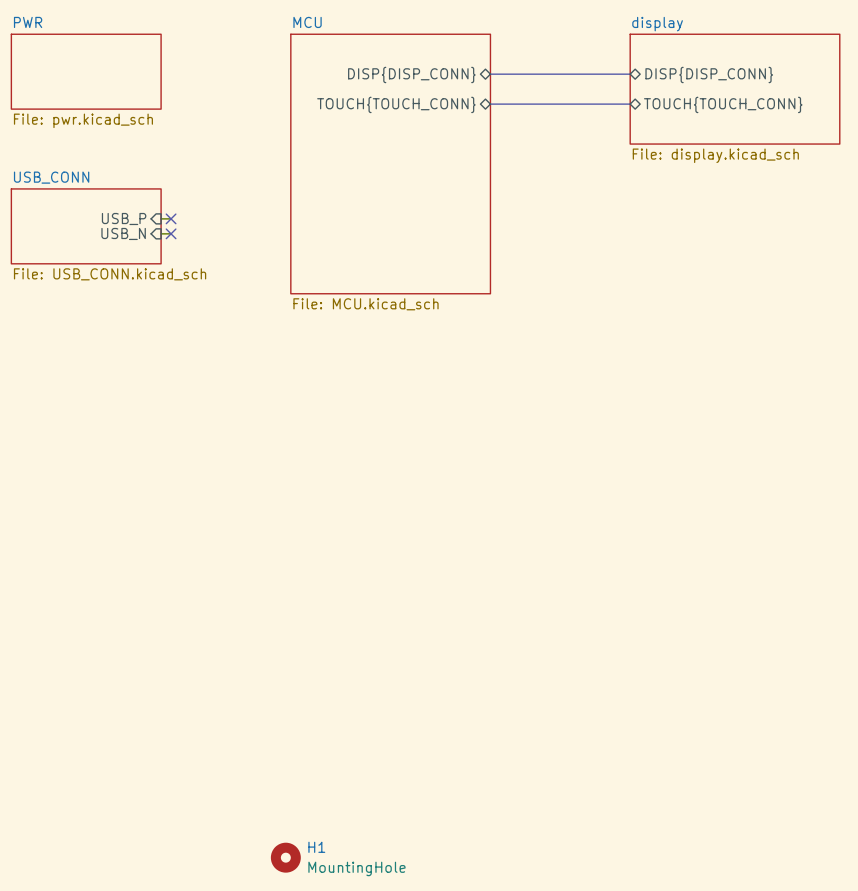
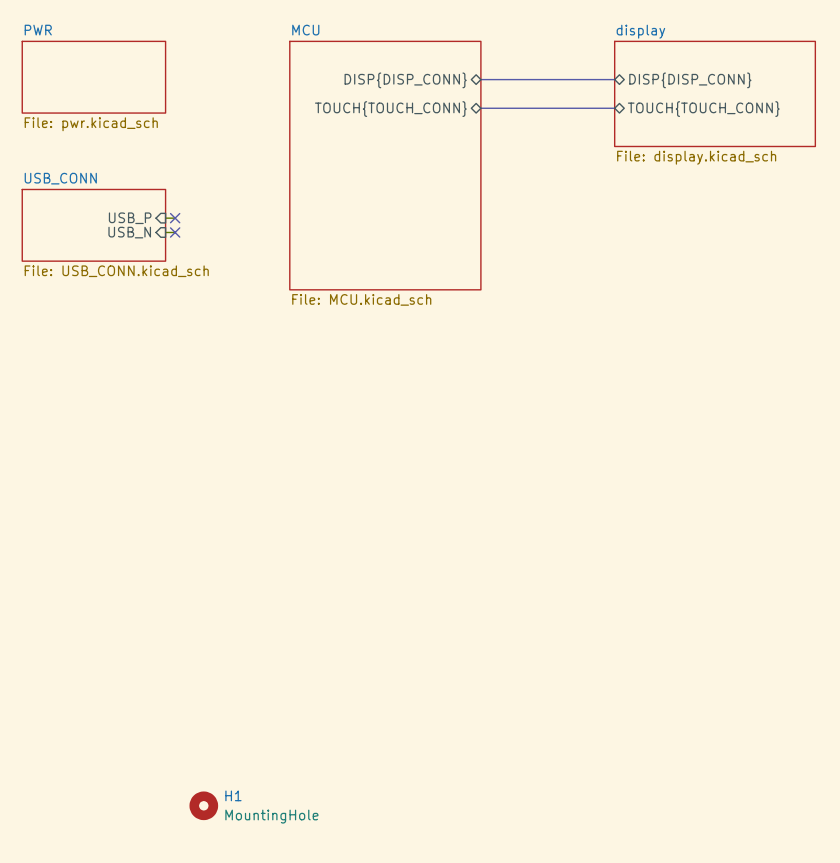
H1 position: (285, 857) -> (203, 805)

